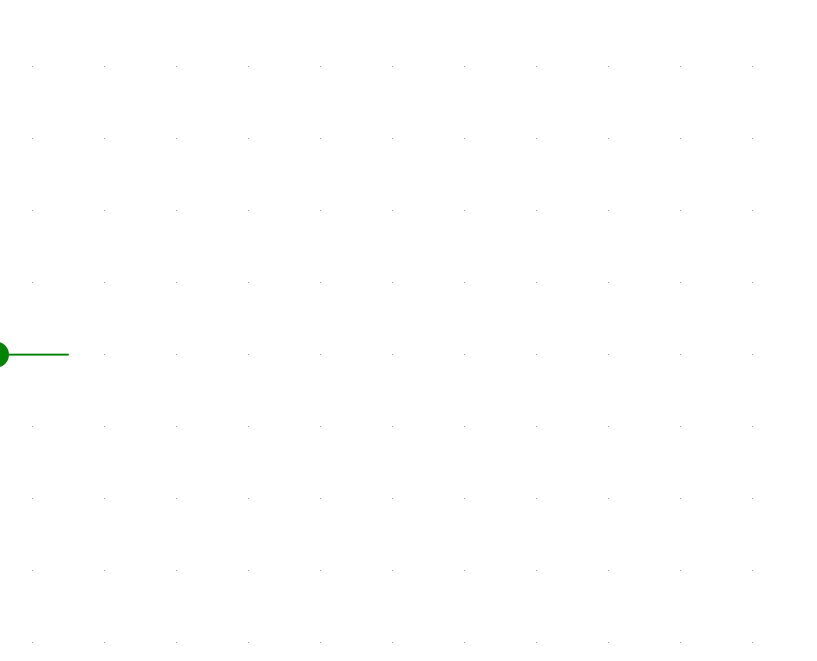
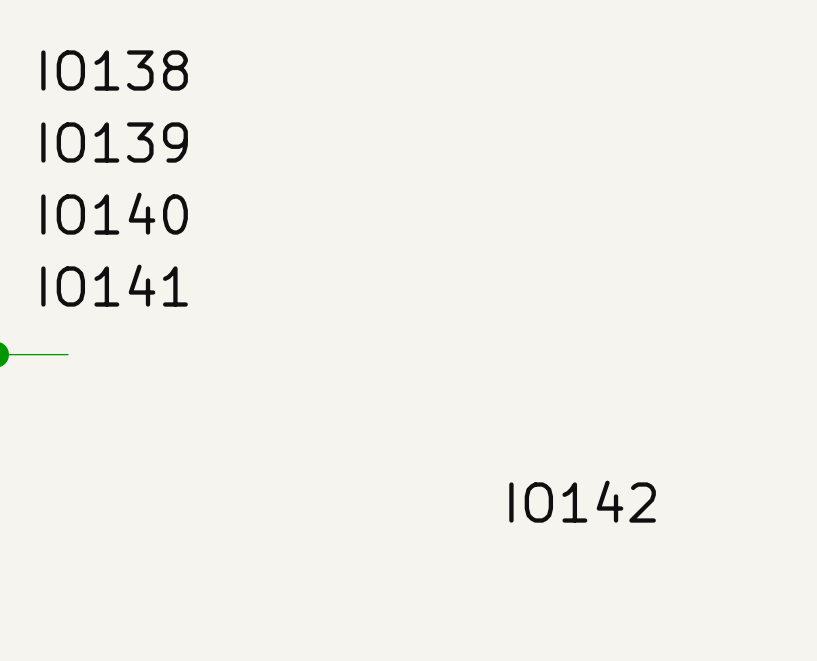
label: none -> IO138 (114, 70)
label: none -> IO139 (114, 142)
label: none -> IO140 (114, 213)
label: none -> IO141 (114, 285)
label: none -> IO142 (582, 501)

